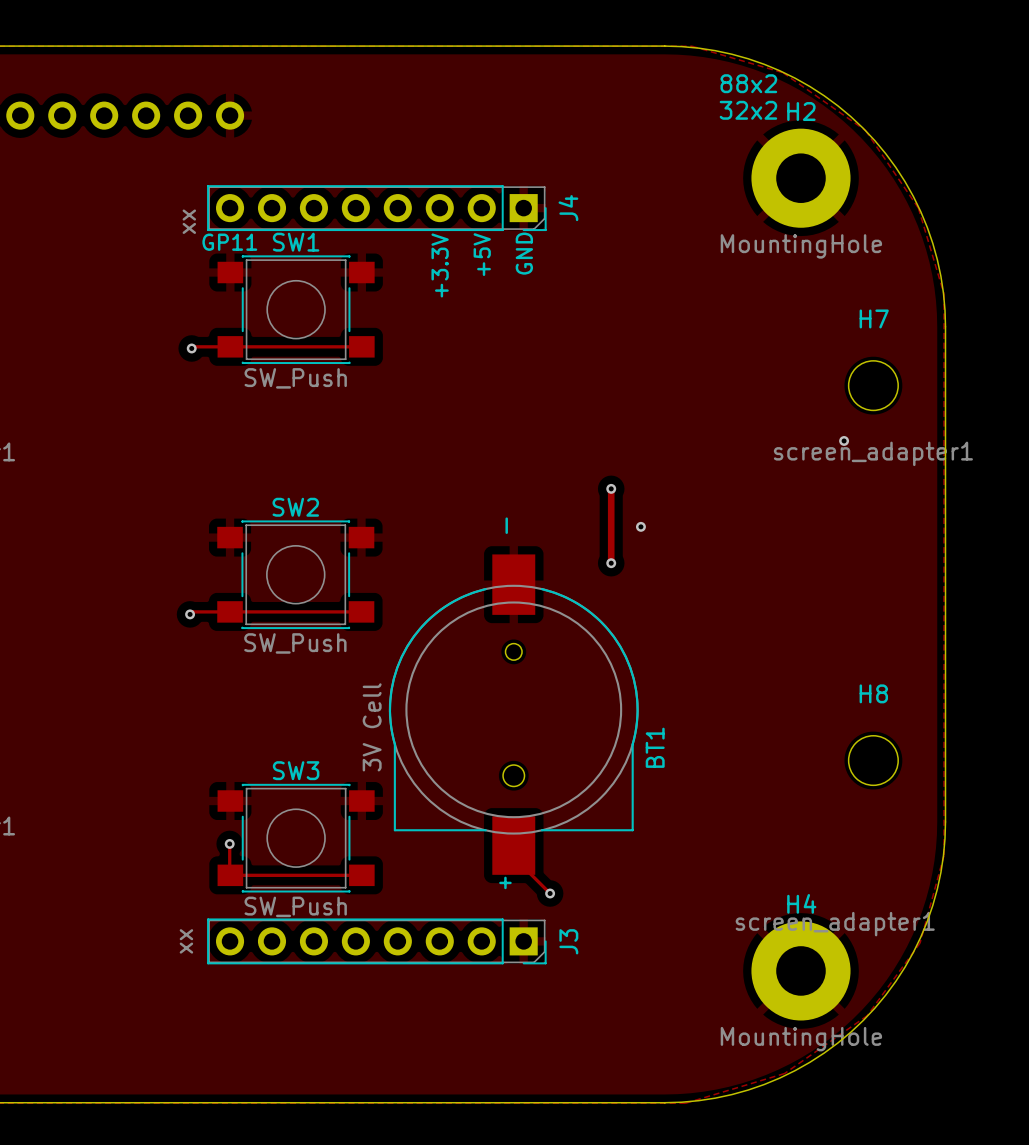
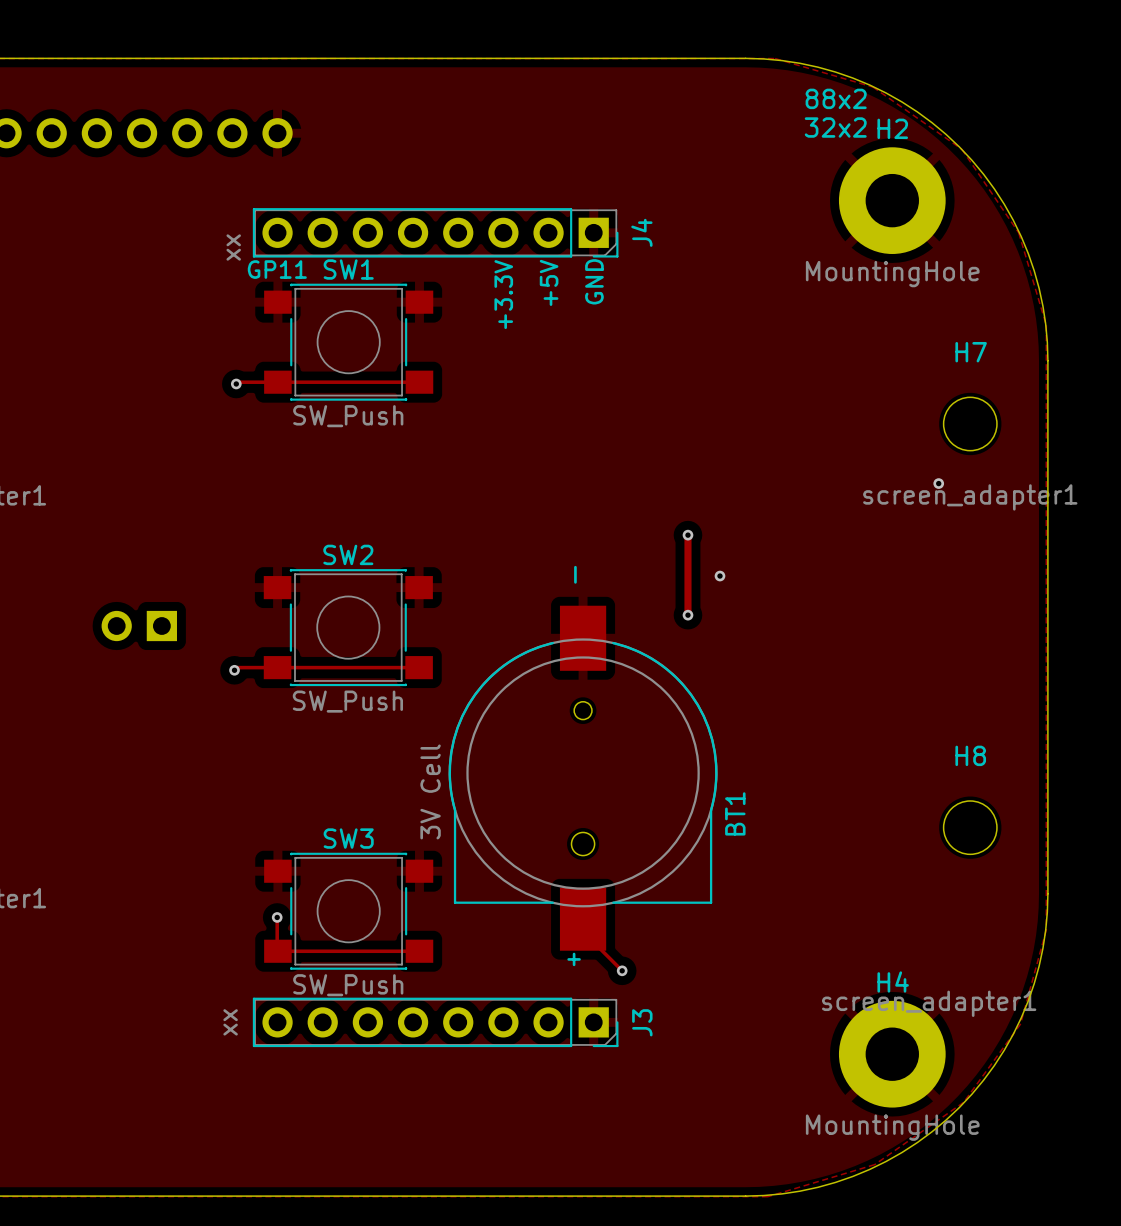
part: none -> (139, 626)

